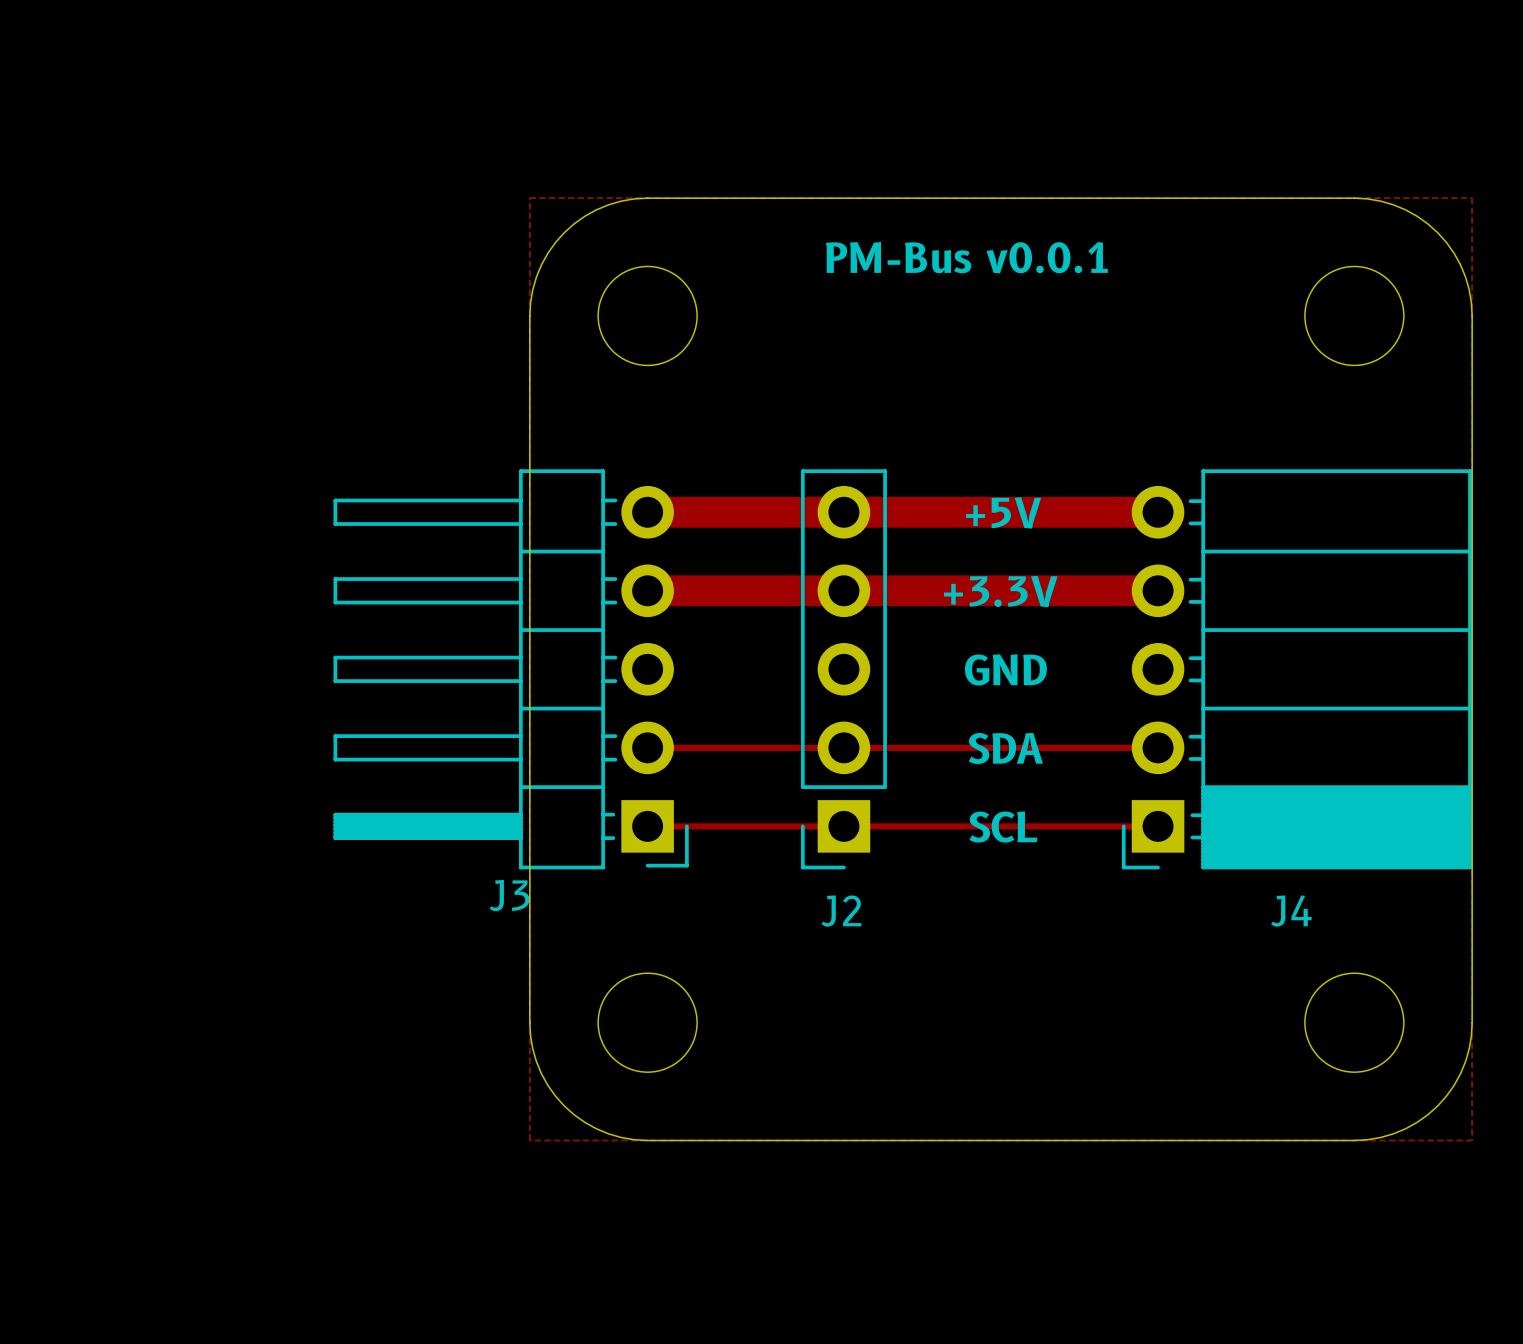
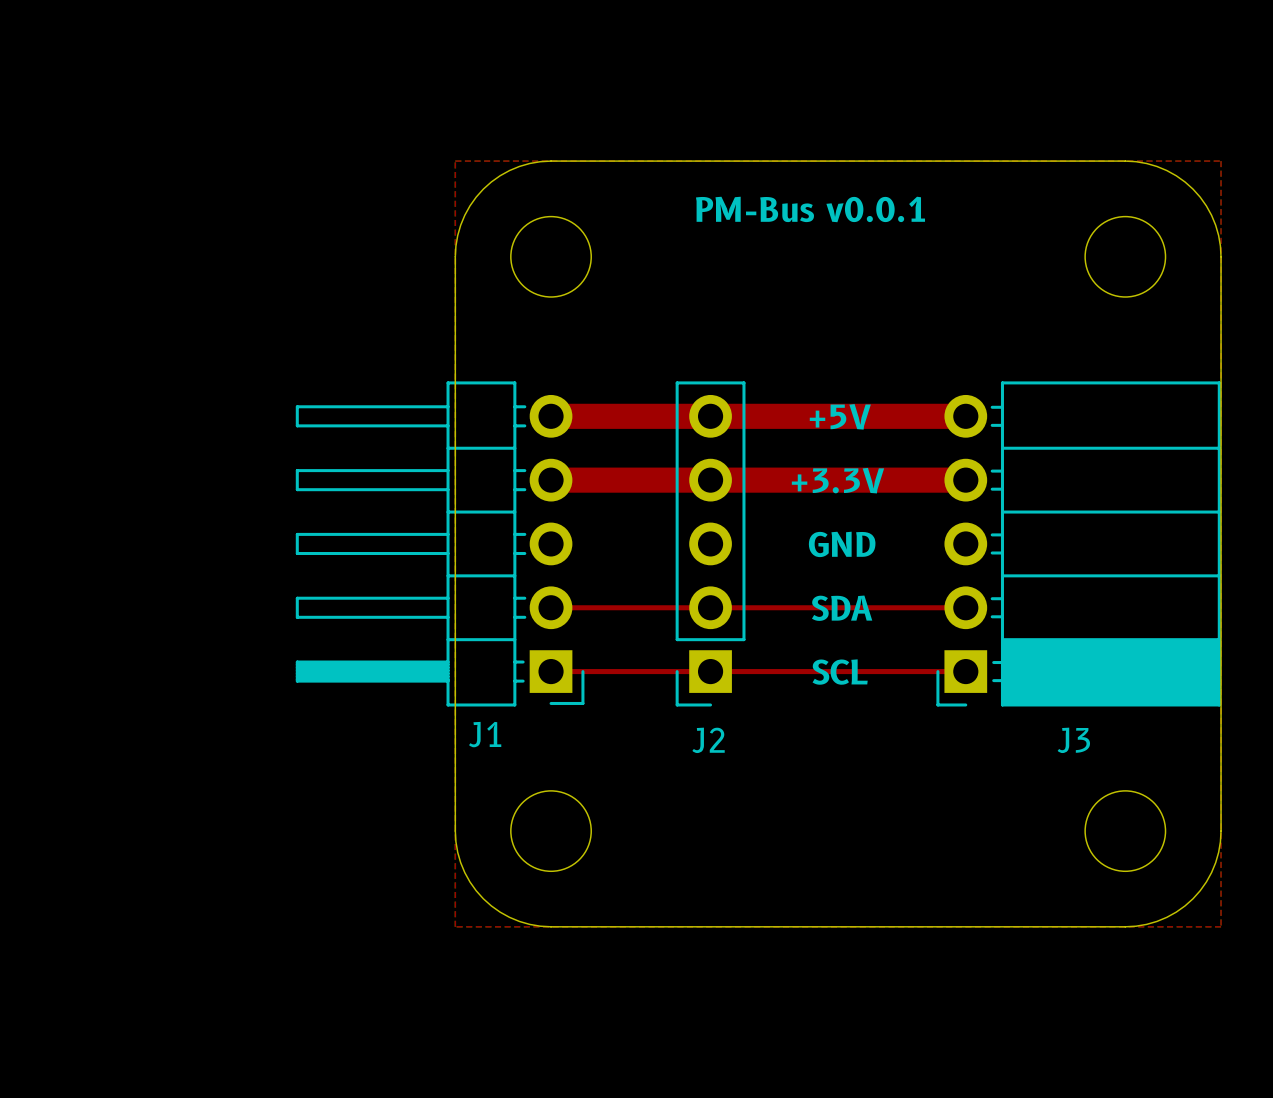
J3 name: J3 (509, 895) -> J1 (485, 734)
J4 name: J4 (1291, 911) -> J3 (1073, 740)

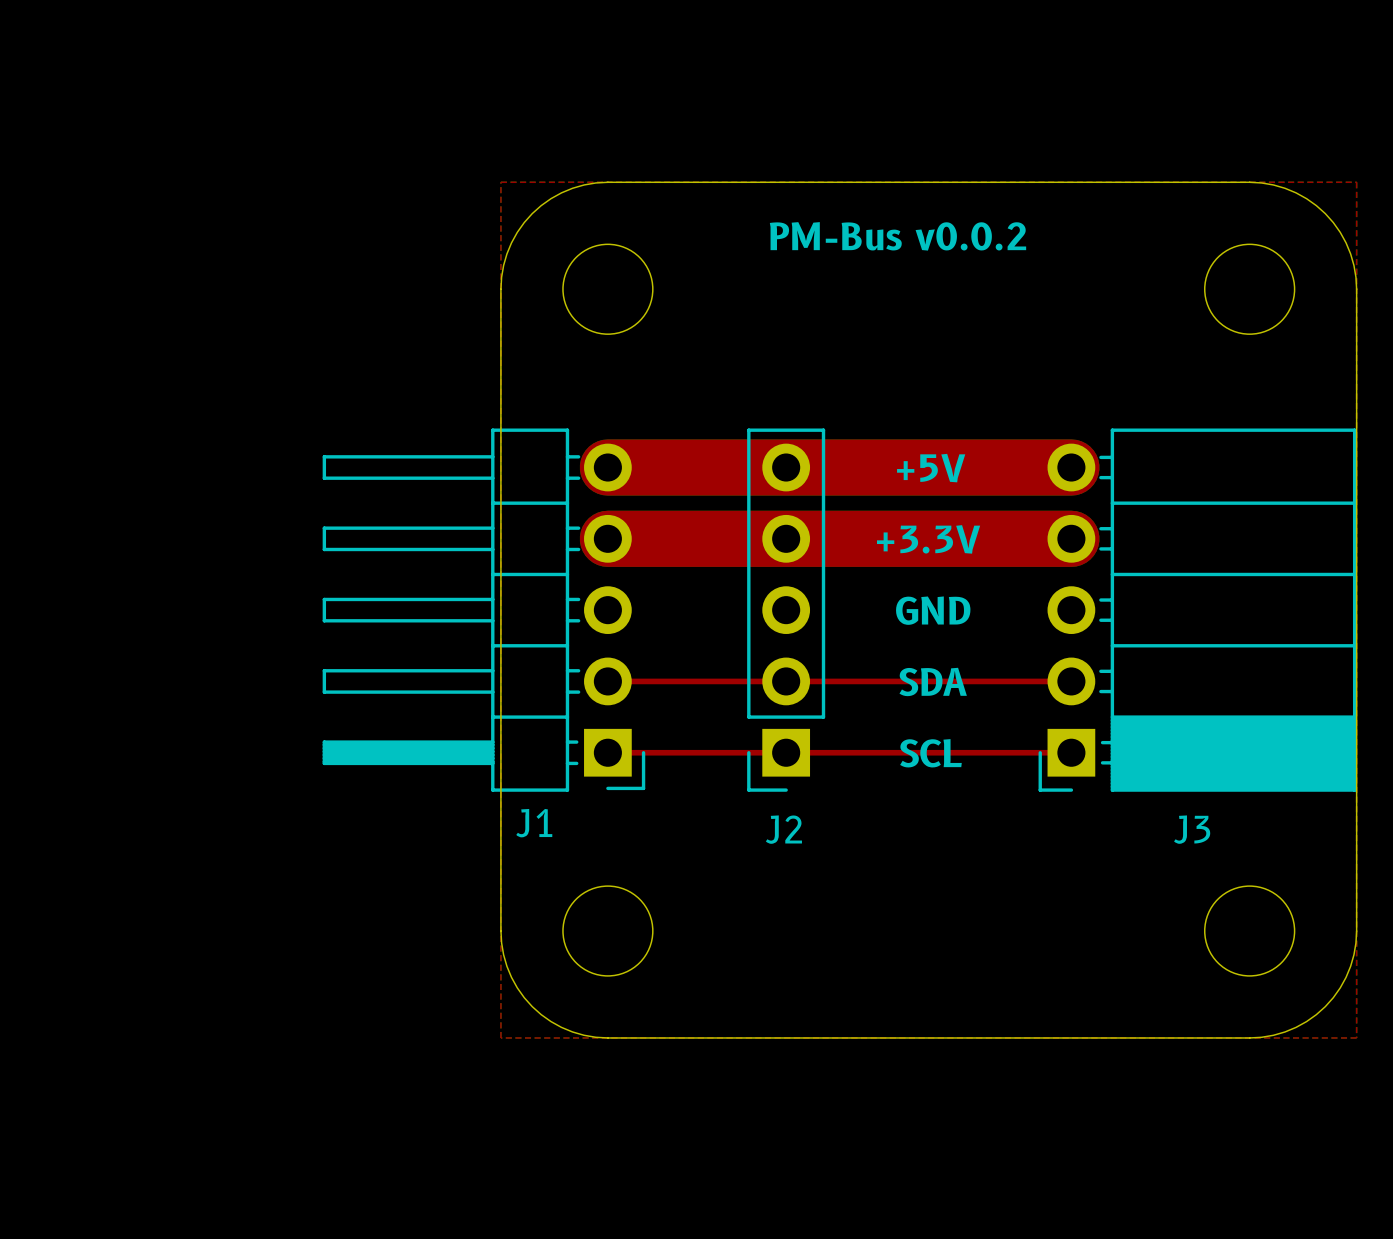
text: PM-Bus v0.0.1 (810, 209) -> PM-Bus v0.0.2 (898, 236)
top track width: thin (551, 416) (965, 416) -> thick (607, 467) (1071, 467)
top track width: thin (551, 480) (965, 480) -> thick (607, 538) (1071, 538)

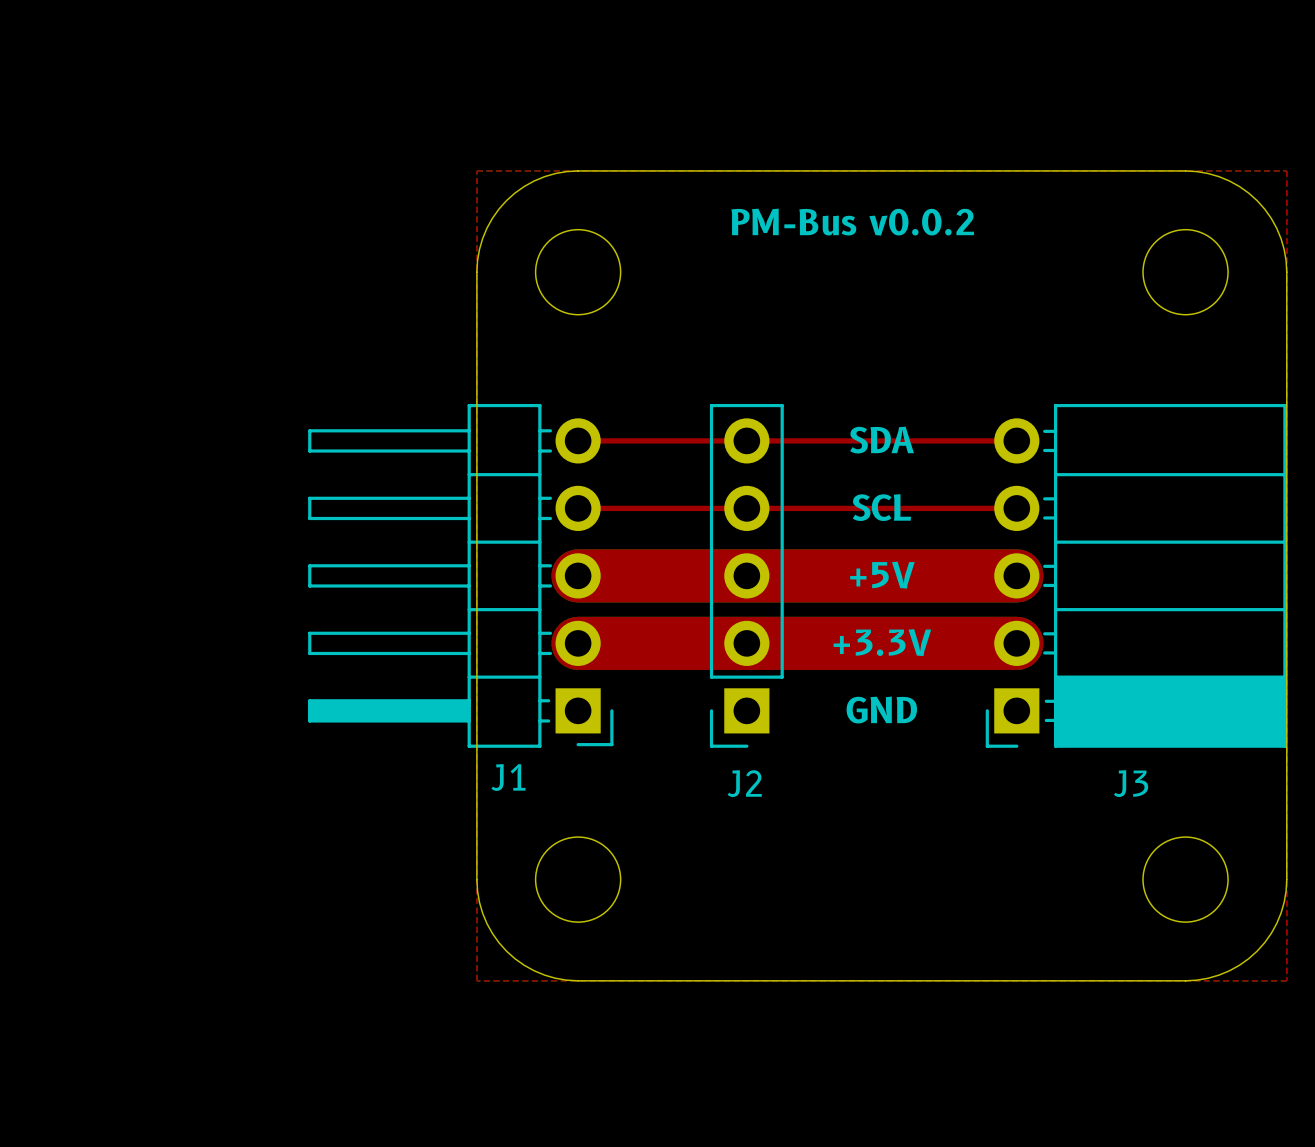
top track width: thick (607, 467) (1071, 467) -> thin (578, 440) (1016, 440)
text position: +5V (931, 468) -> +5V (882, 575)
top track width: thick (607, 538) (1071, 538) -> thin (578, 508) (1016, 508)
text position: +3.3V (928, 539) -> +3.3V (882, 642)
text position: GND (933, 610) -> GND (881, 710)
top track width: thin (607, 681) (1071, 681) -> thick (578, 643) (1016, 643)
text position: SDA (933, 681) -> SDA (882, 440)
top track: (607, 752) (1071, 752) -> (578, 575) (1016, 575)
text position: SCL (930, 753) -> SCL (881, 507)

